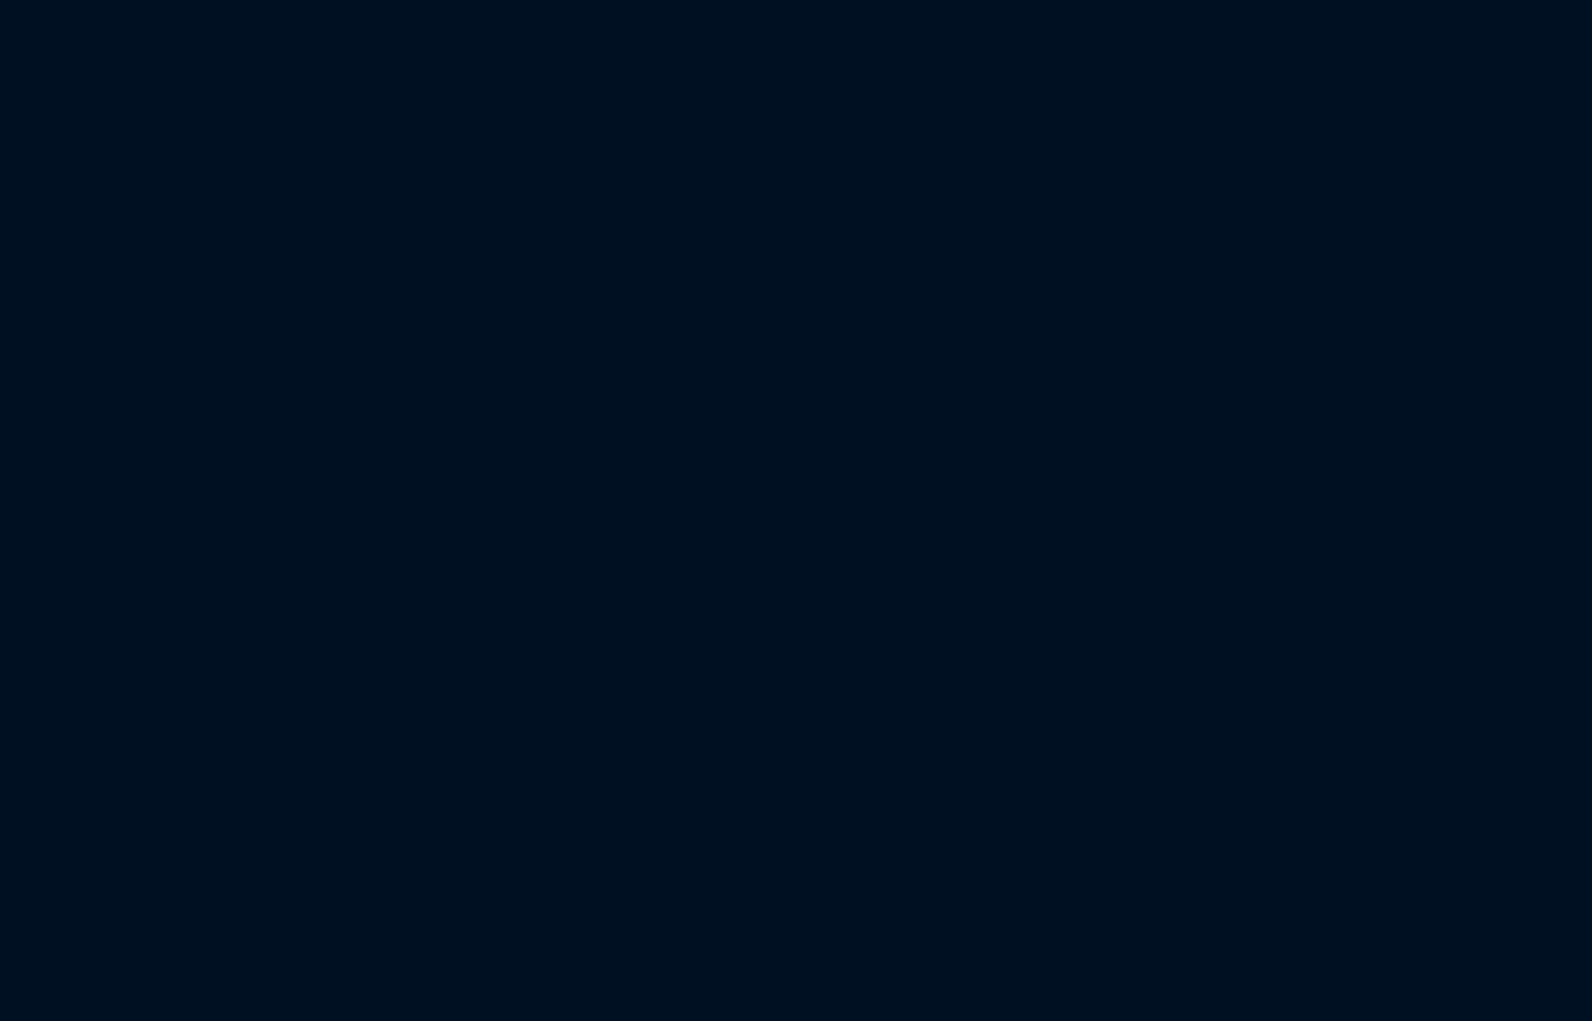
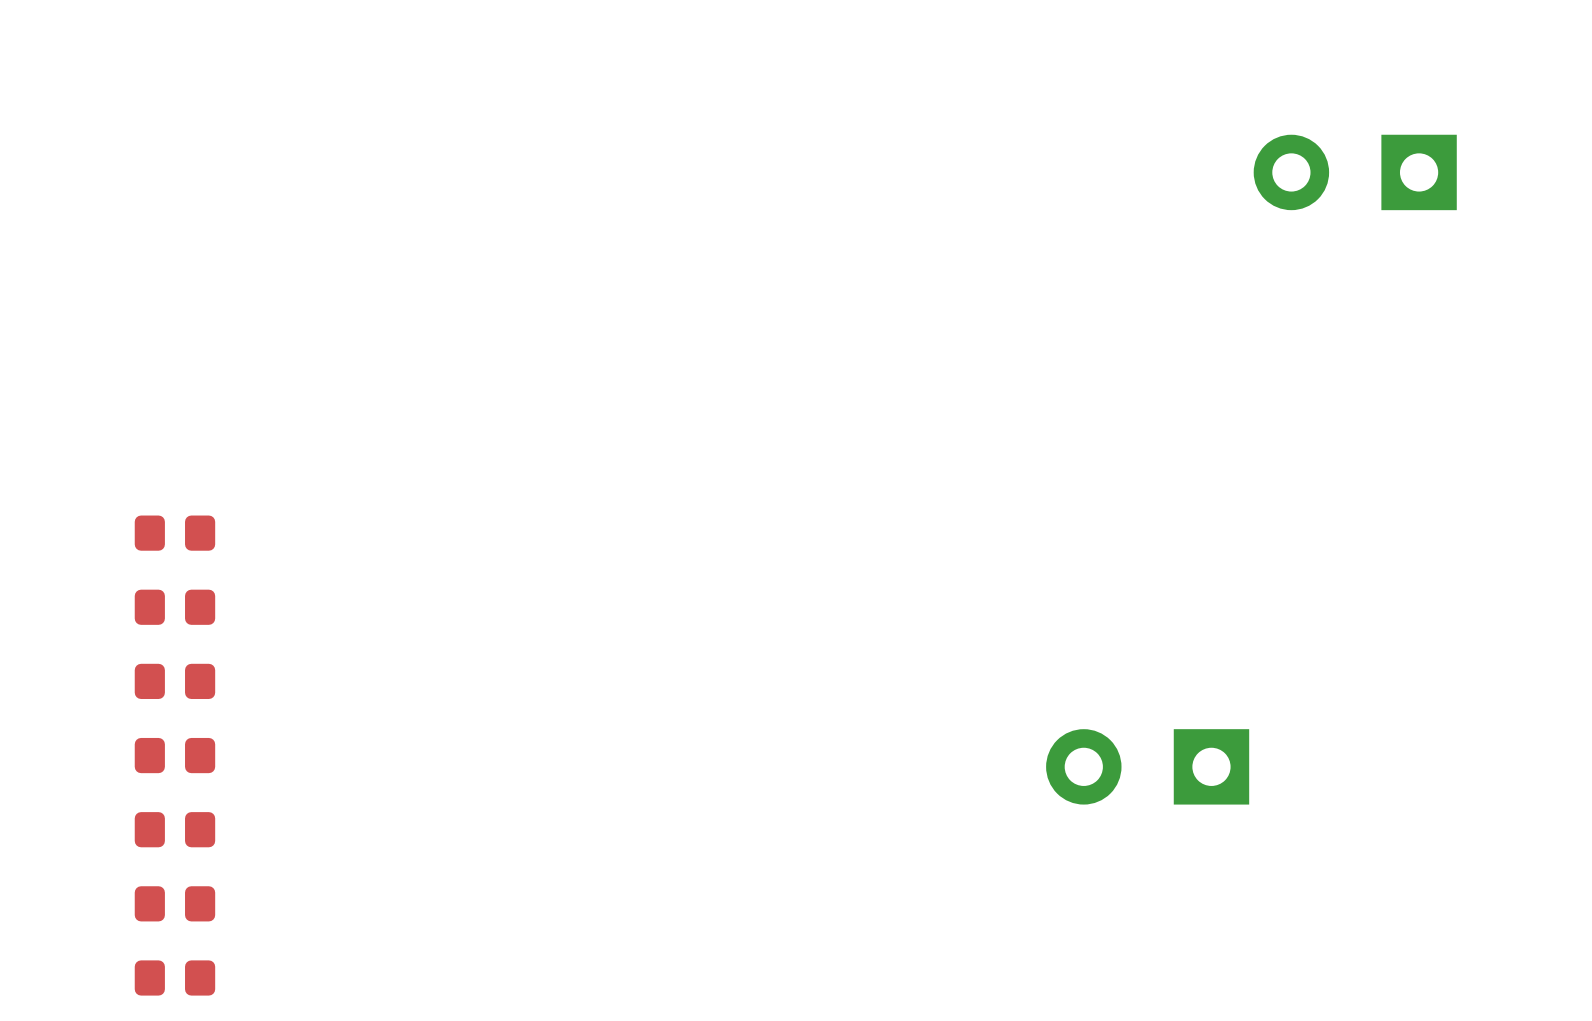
part: none -> (1355, 172)
part: none -> (174, 533)
part: none -> (174, 607)
part: none -> (174, 681)
part: none -> (174, 755)
part: none -> (1147, 766)
part: none -> (174, 829)
part: none -> (174, 903)
part: none -> (174, 977)

